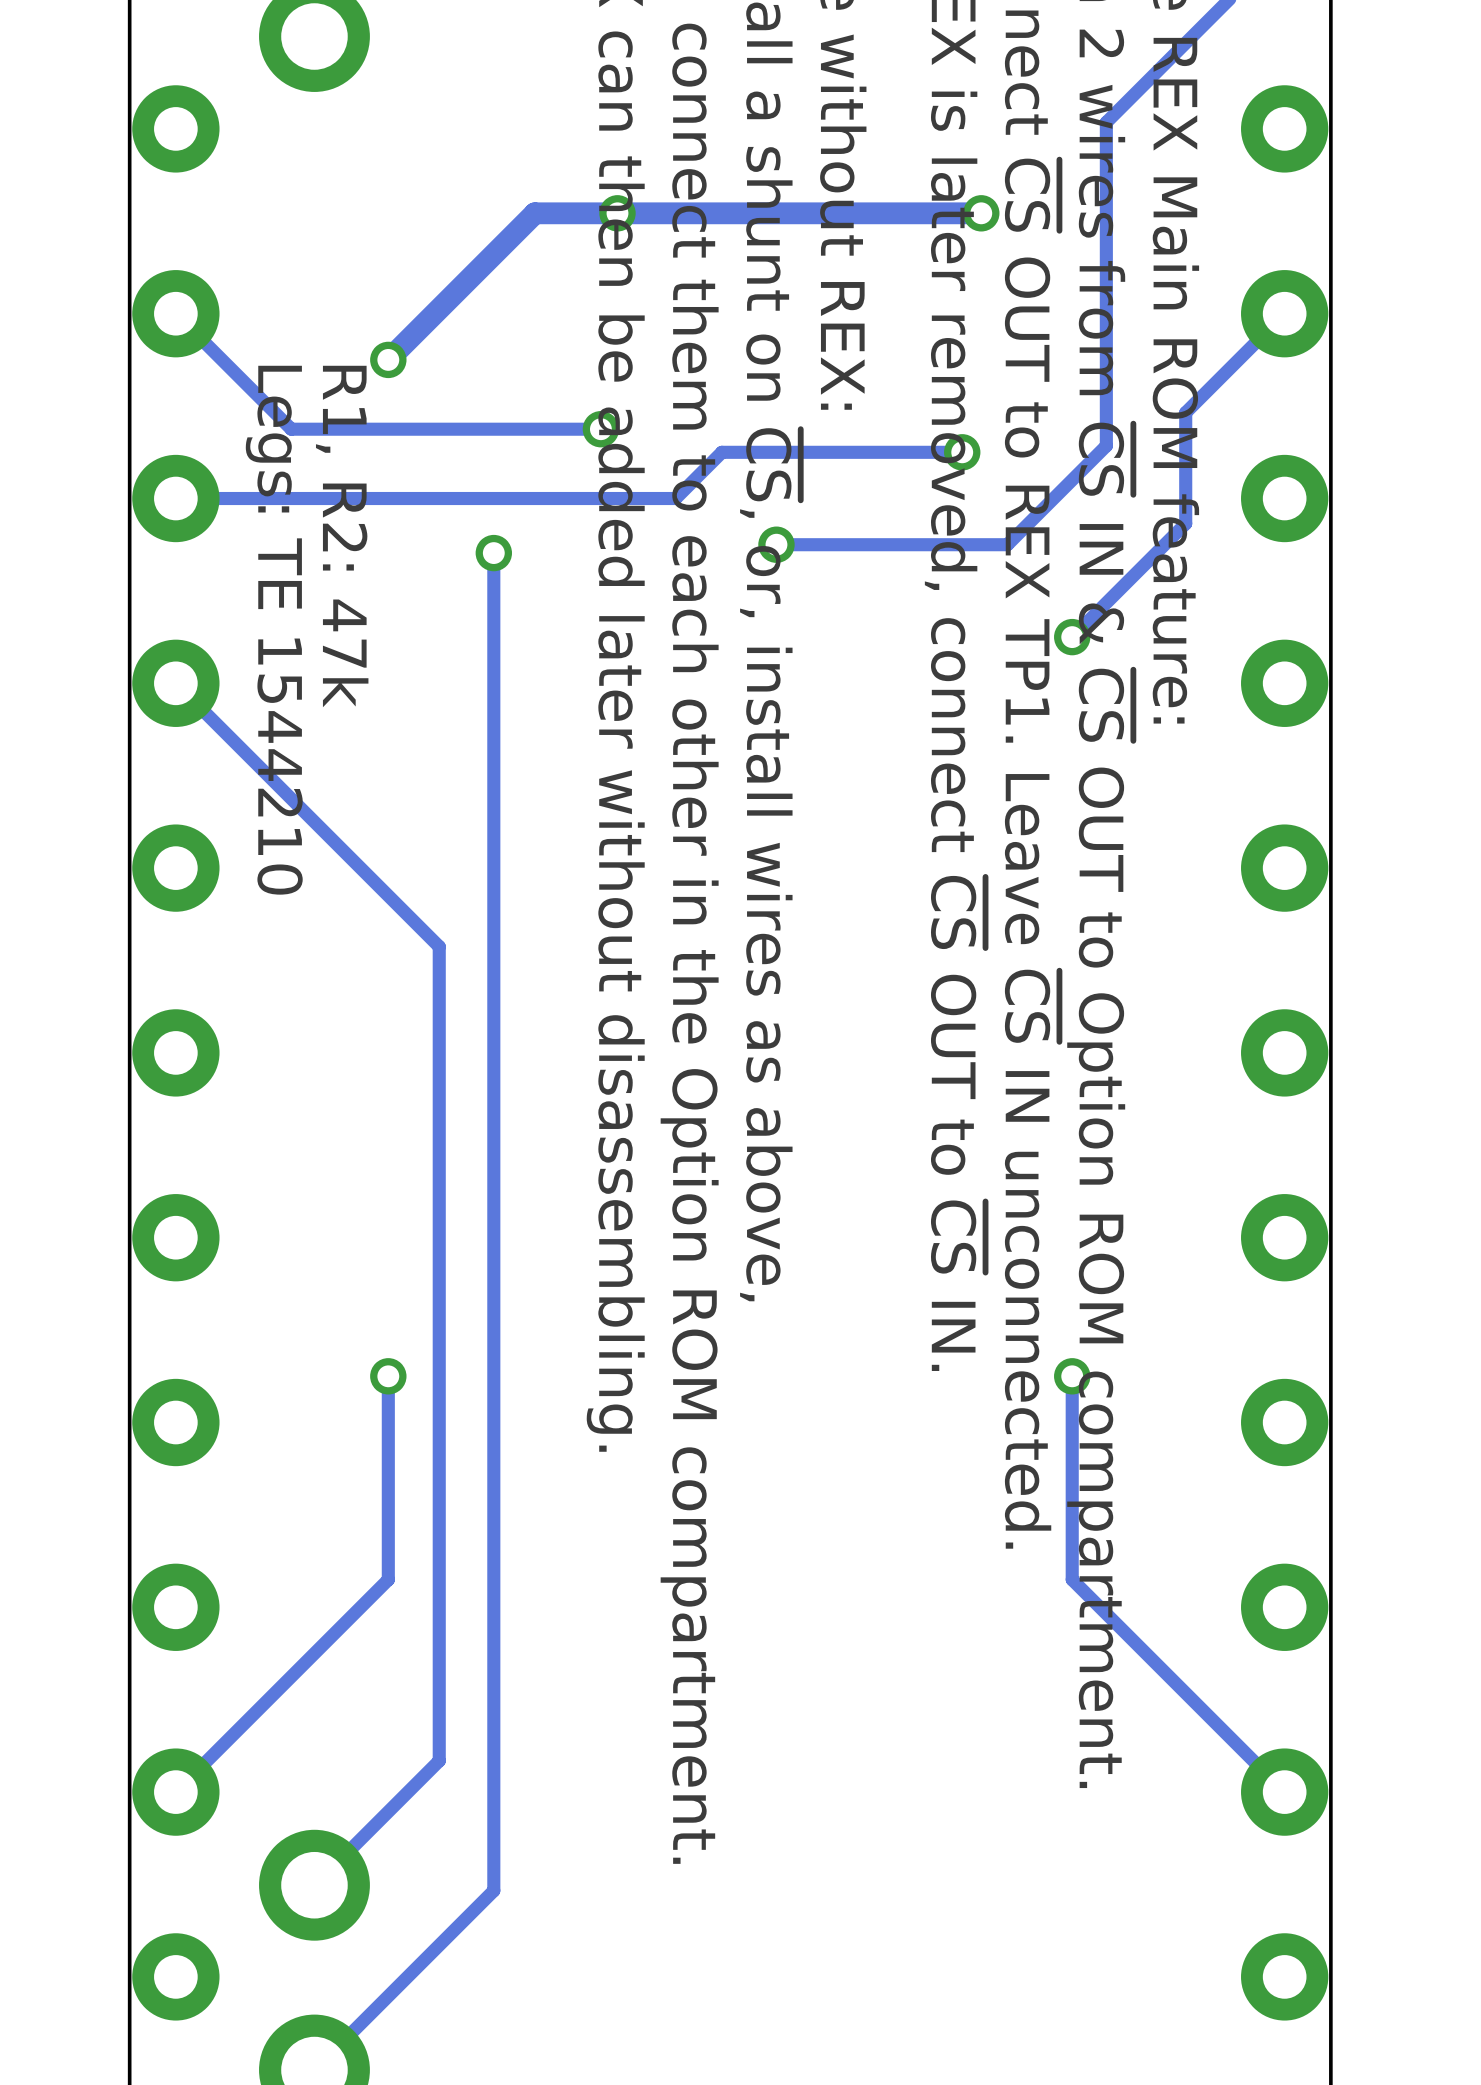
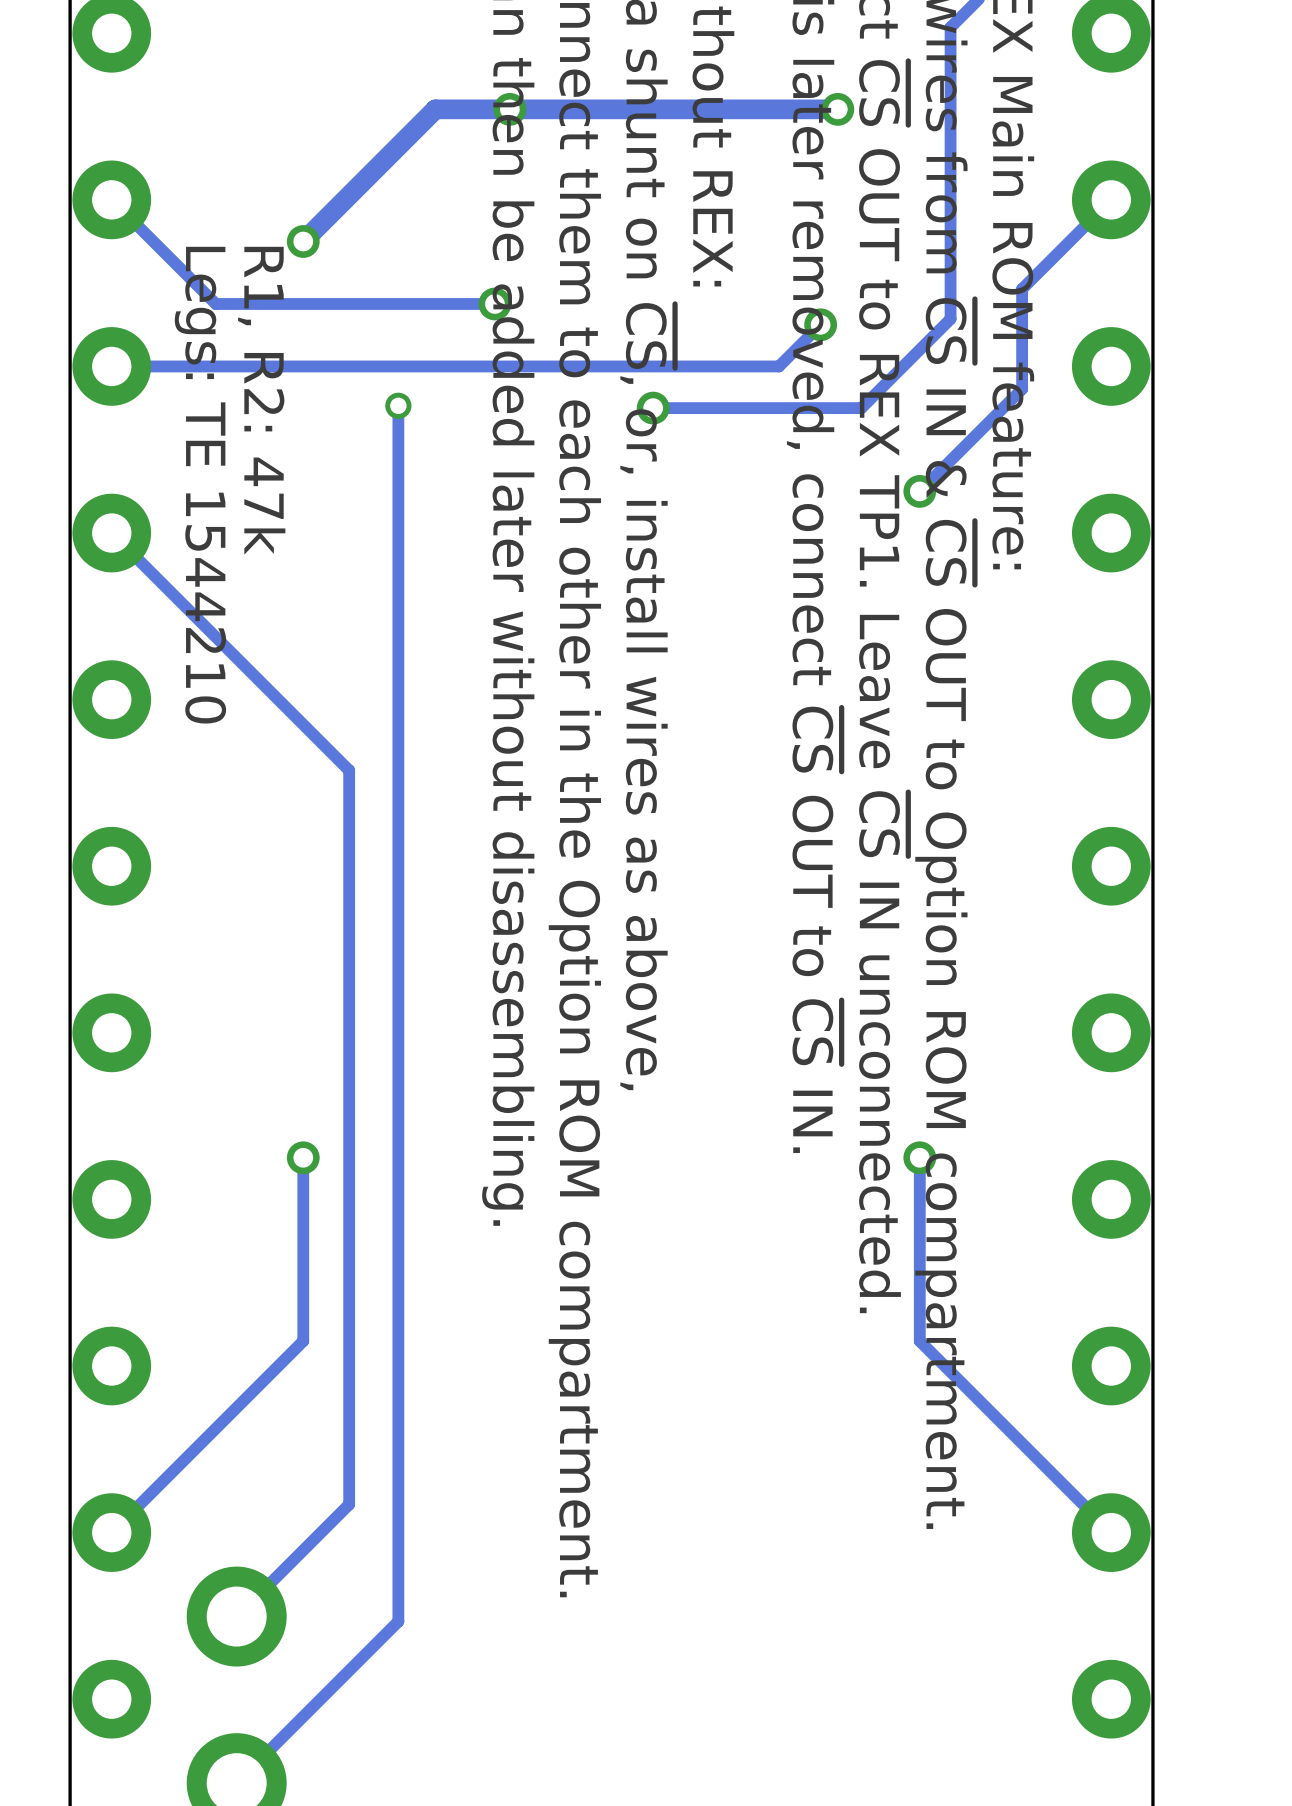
track: (962, 452) (721, 452) (675, 498) -> (820, 324) (778, 366) (562, 366)
via size: [475, 534, 513, 572] -> [385, 392, 412, 419]

